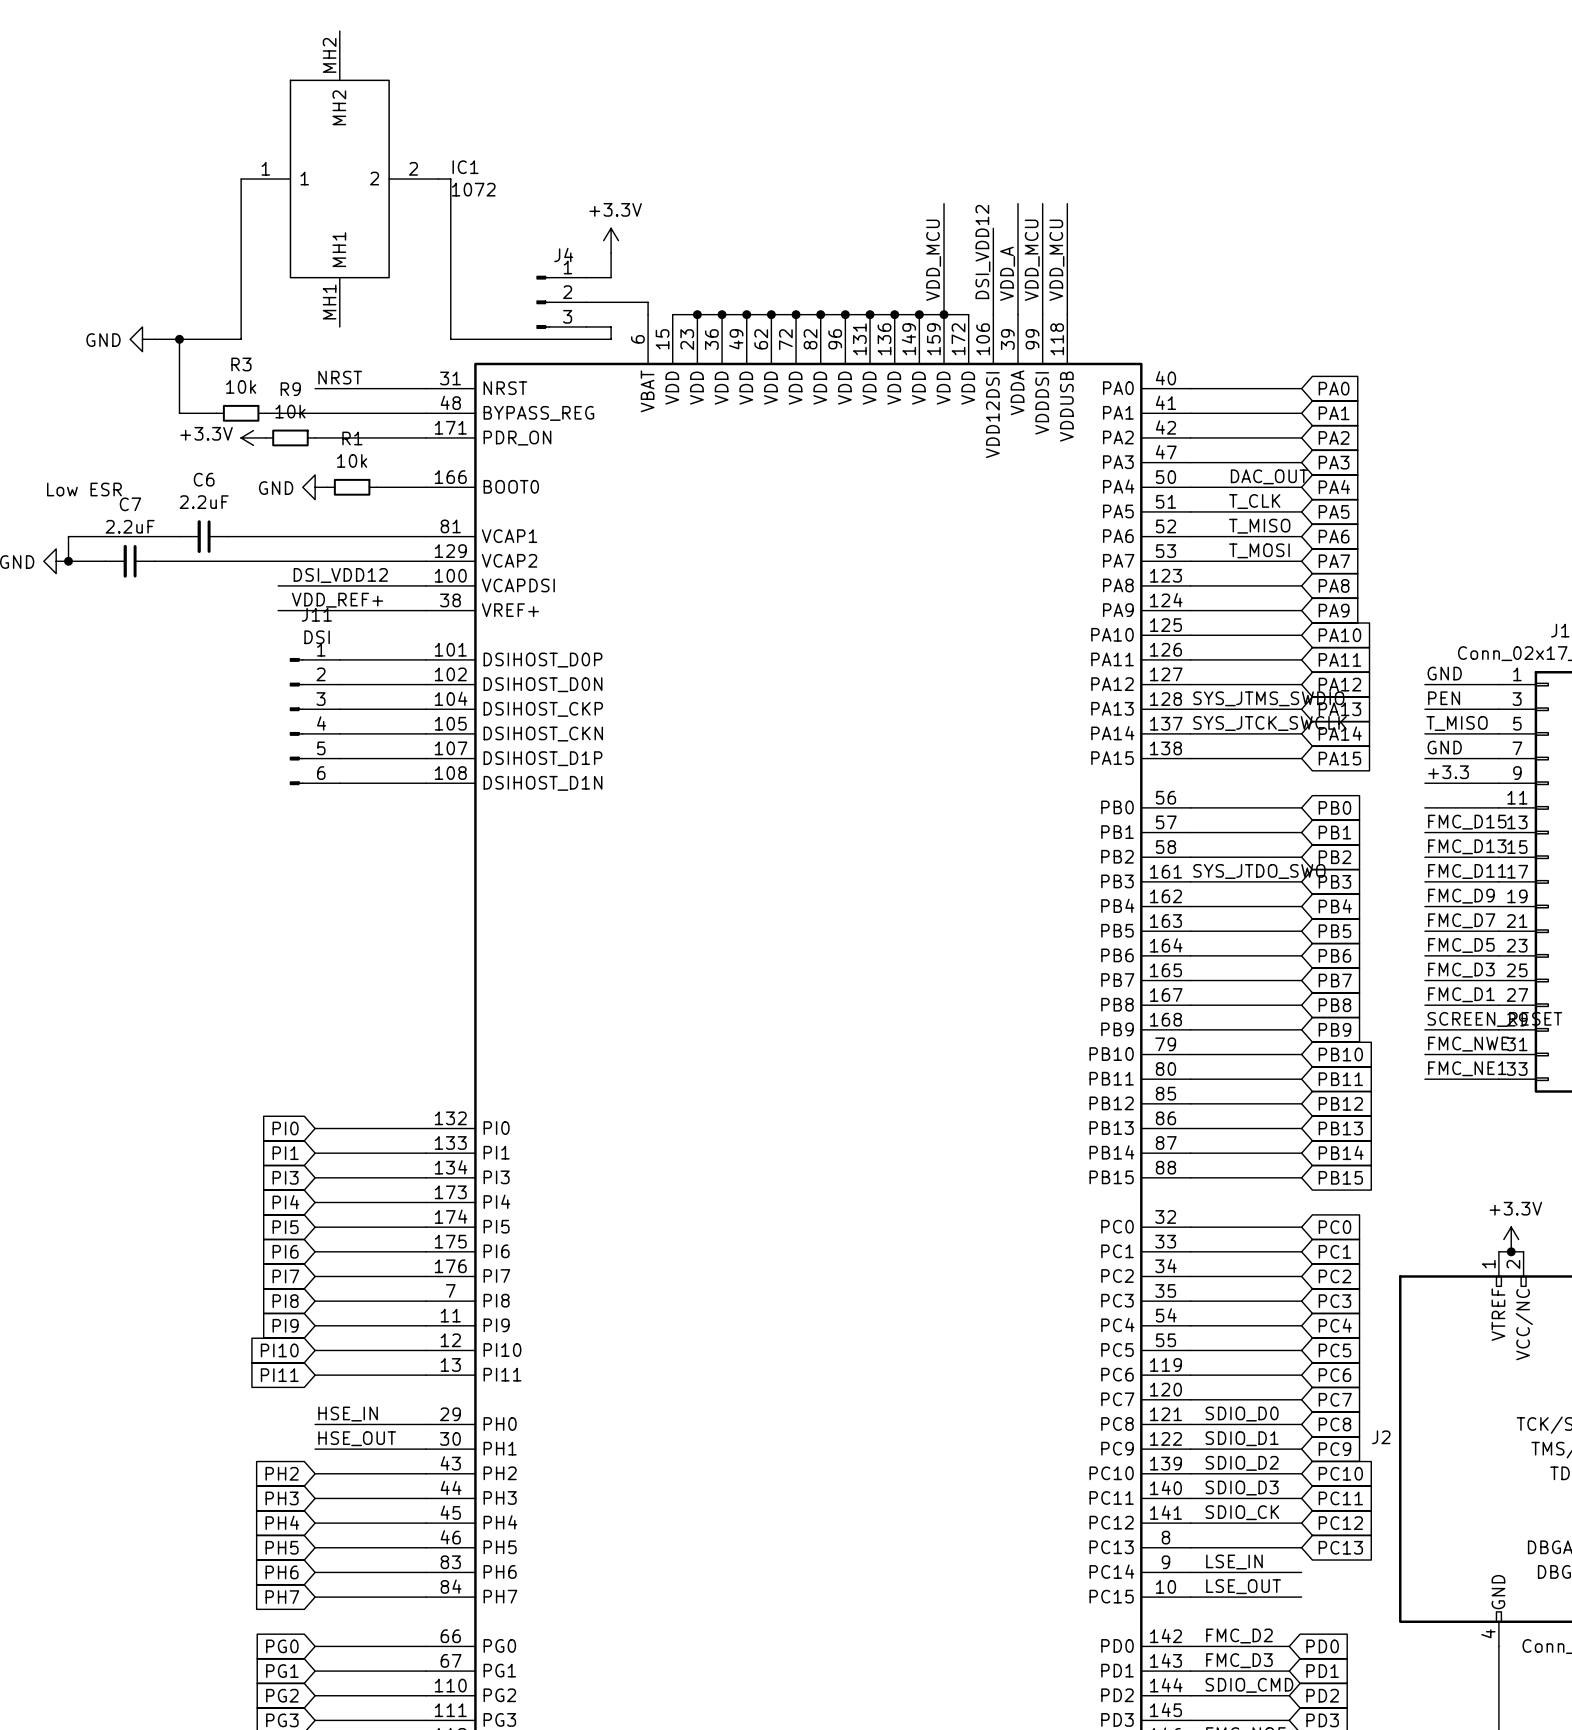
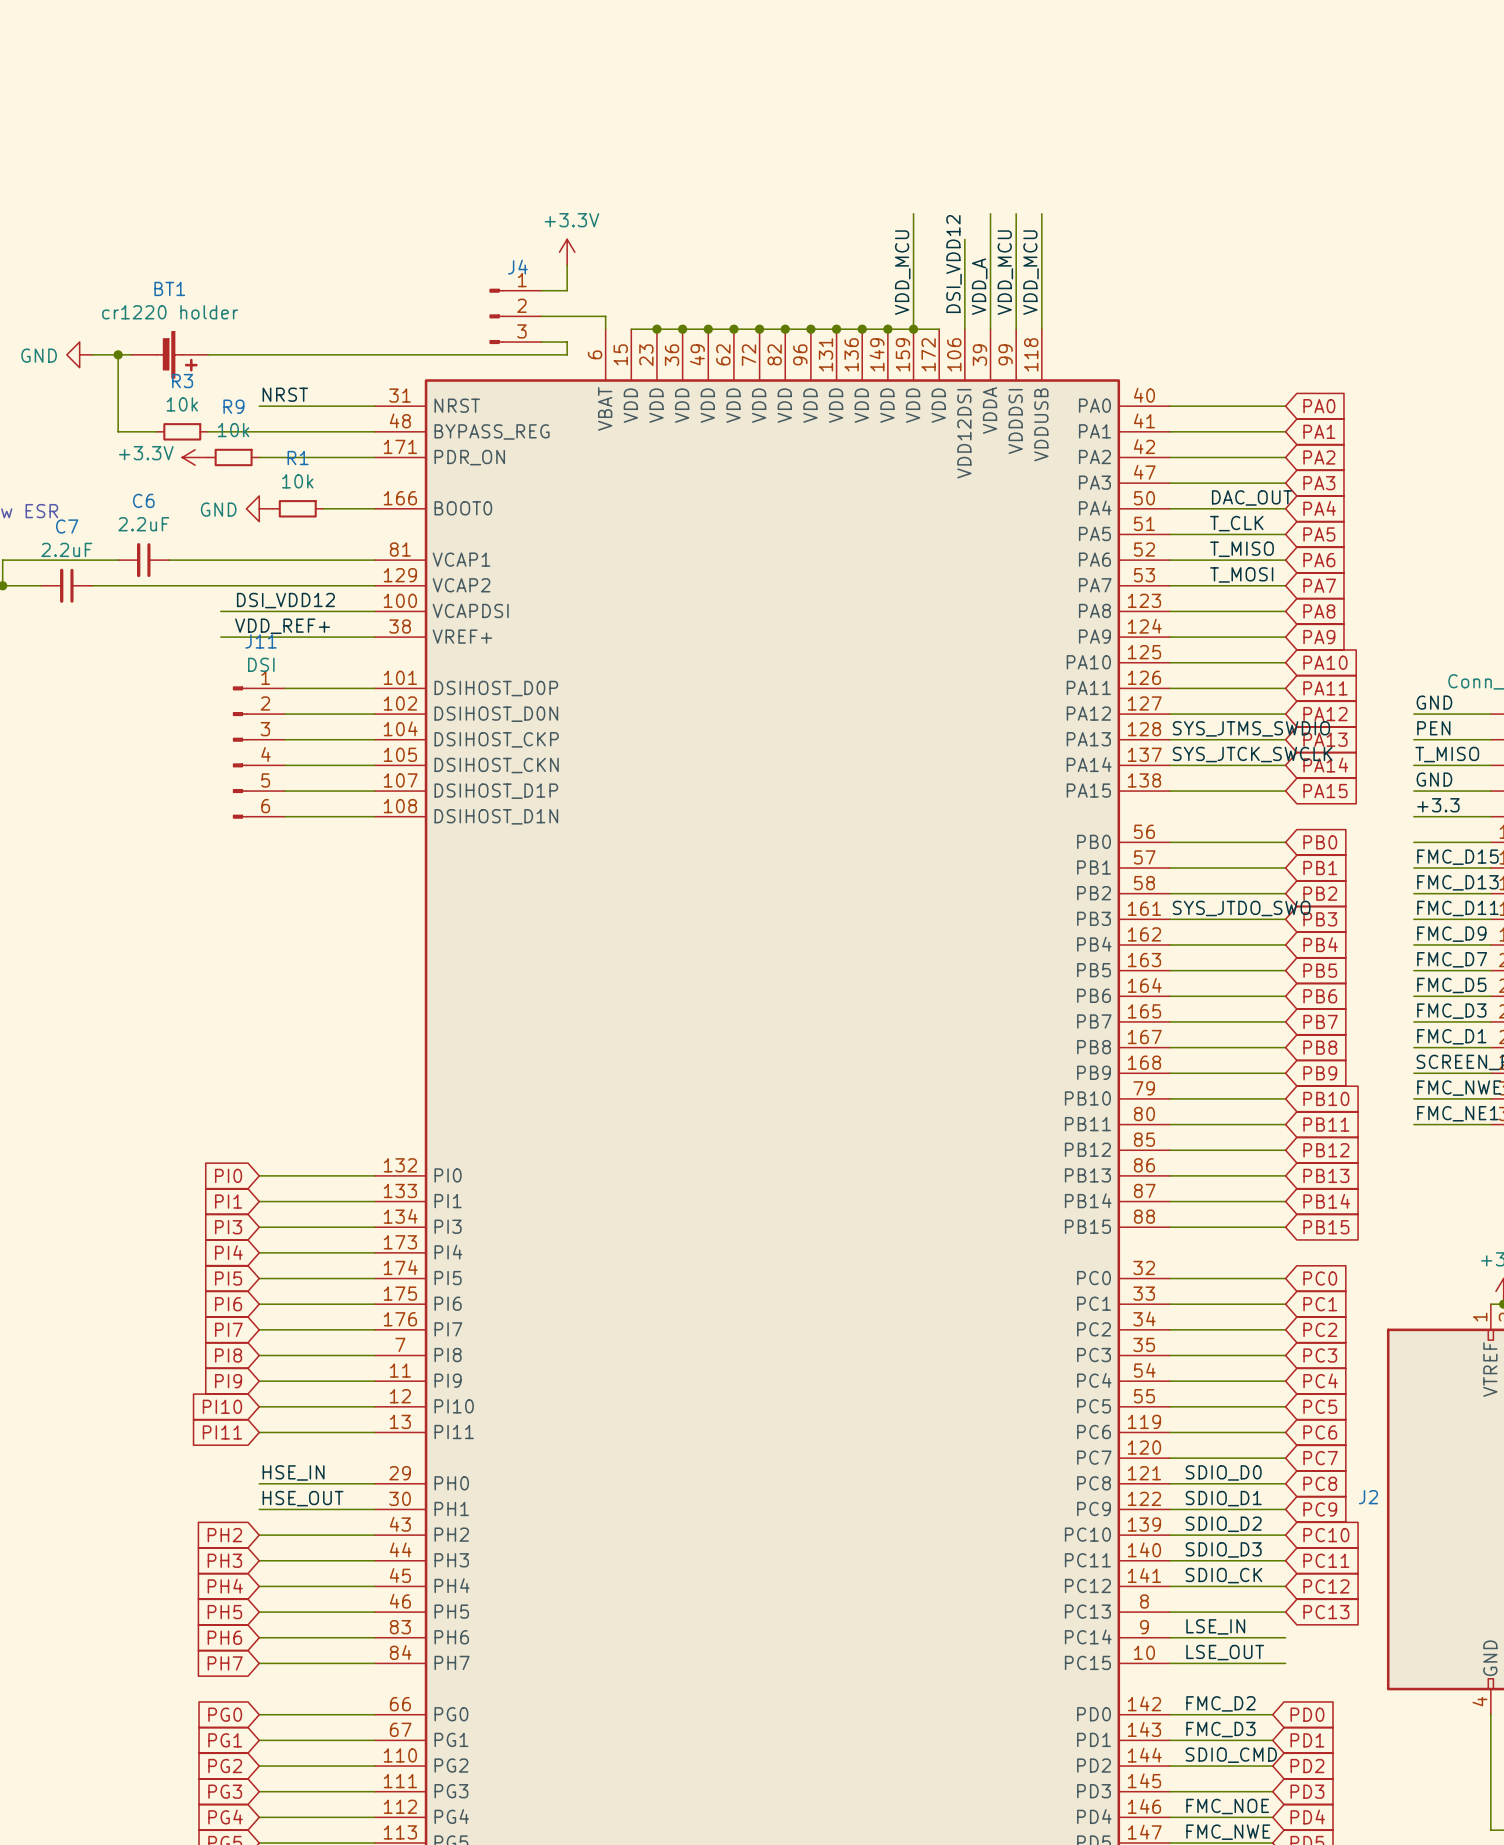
wire: (241, 179) (241, 339) (191, 339) -> none
IC1: 1072 (339, 179) -> none
wire: (438, 179) (450, 179) (450, 339) -> (207, 354) (400, 354)
BT1: none -> cr1220 holder (169, 354)

